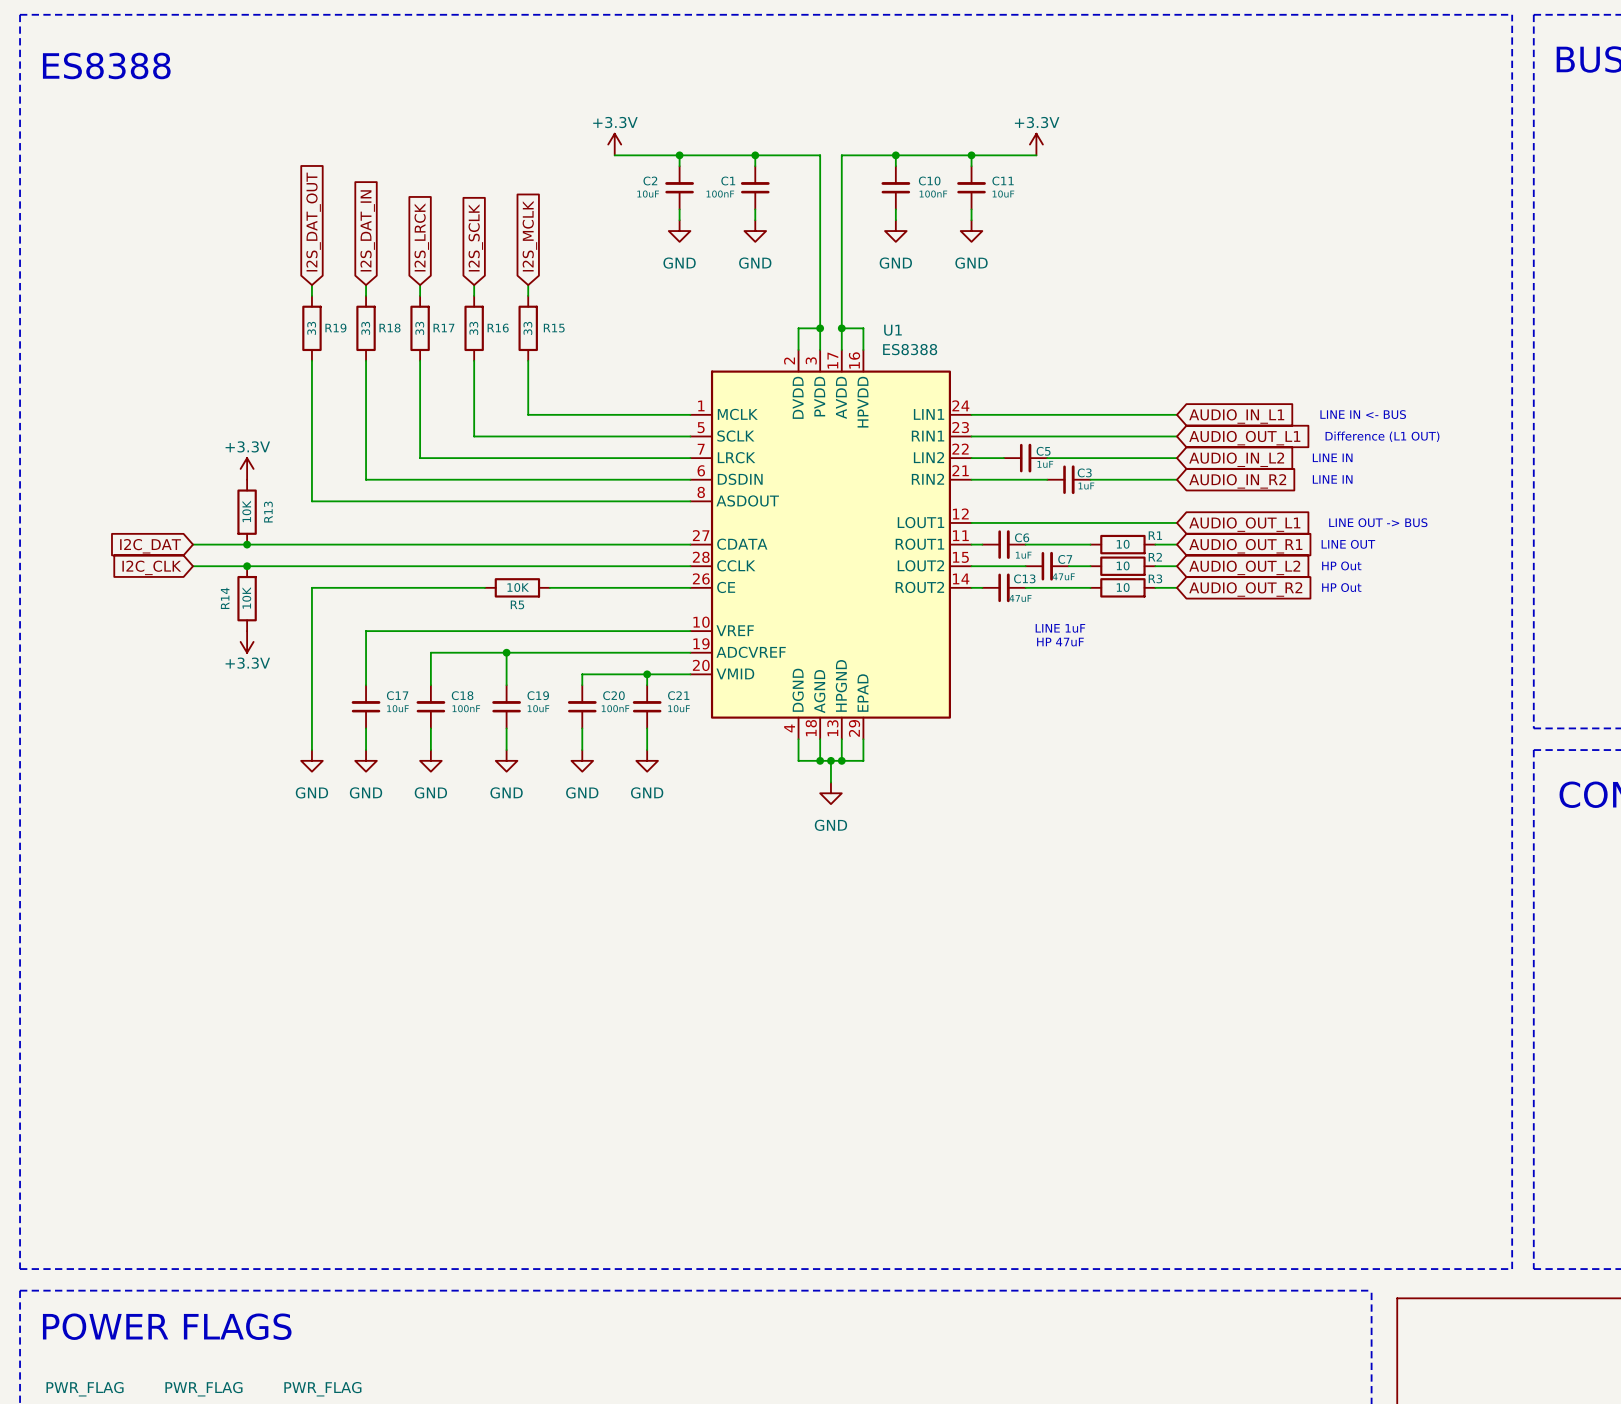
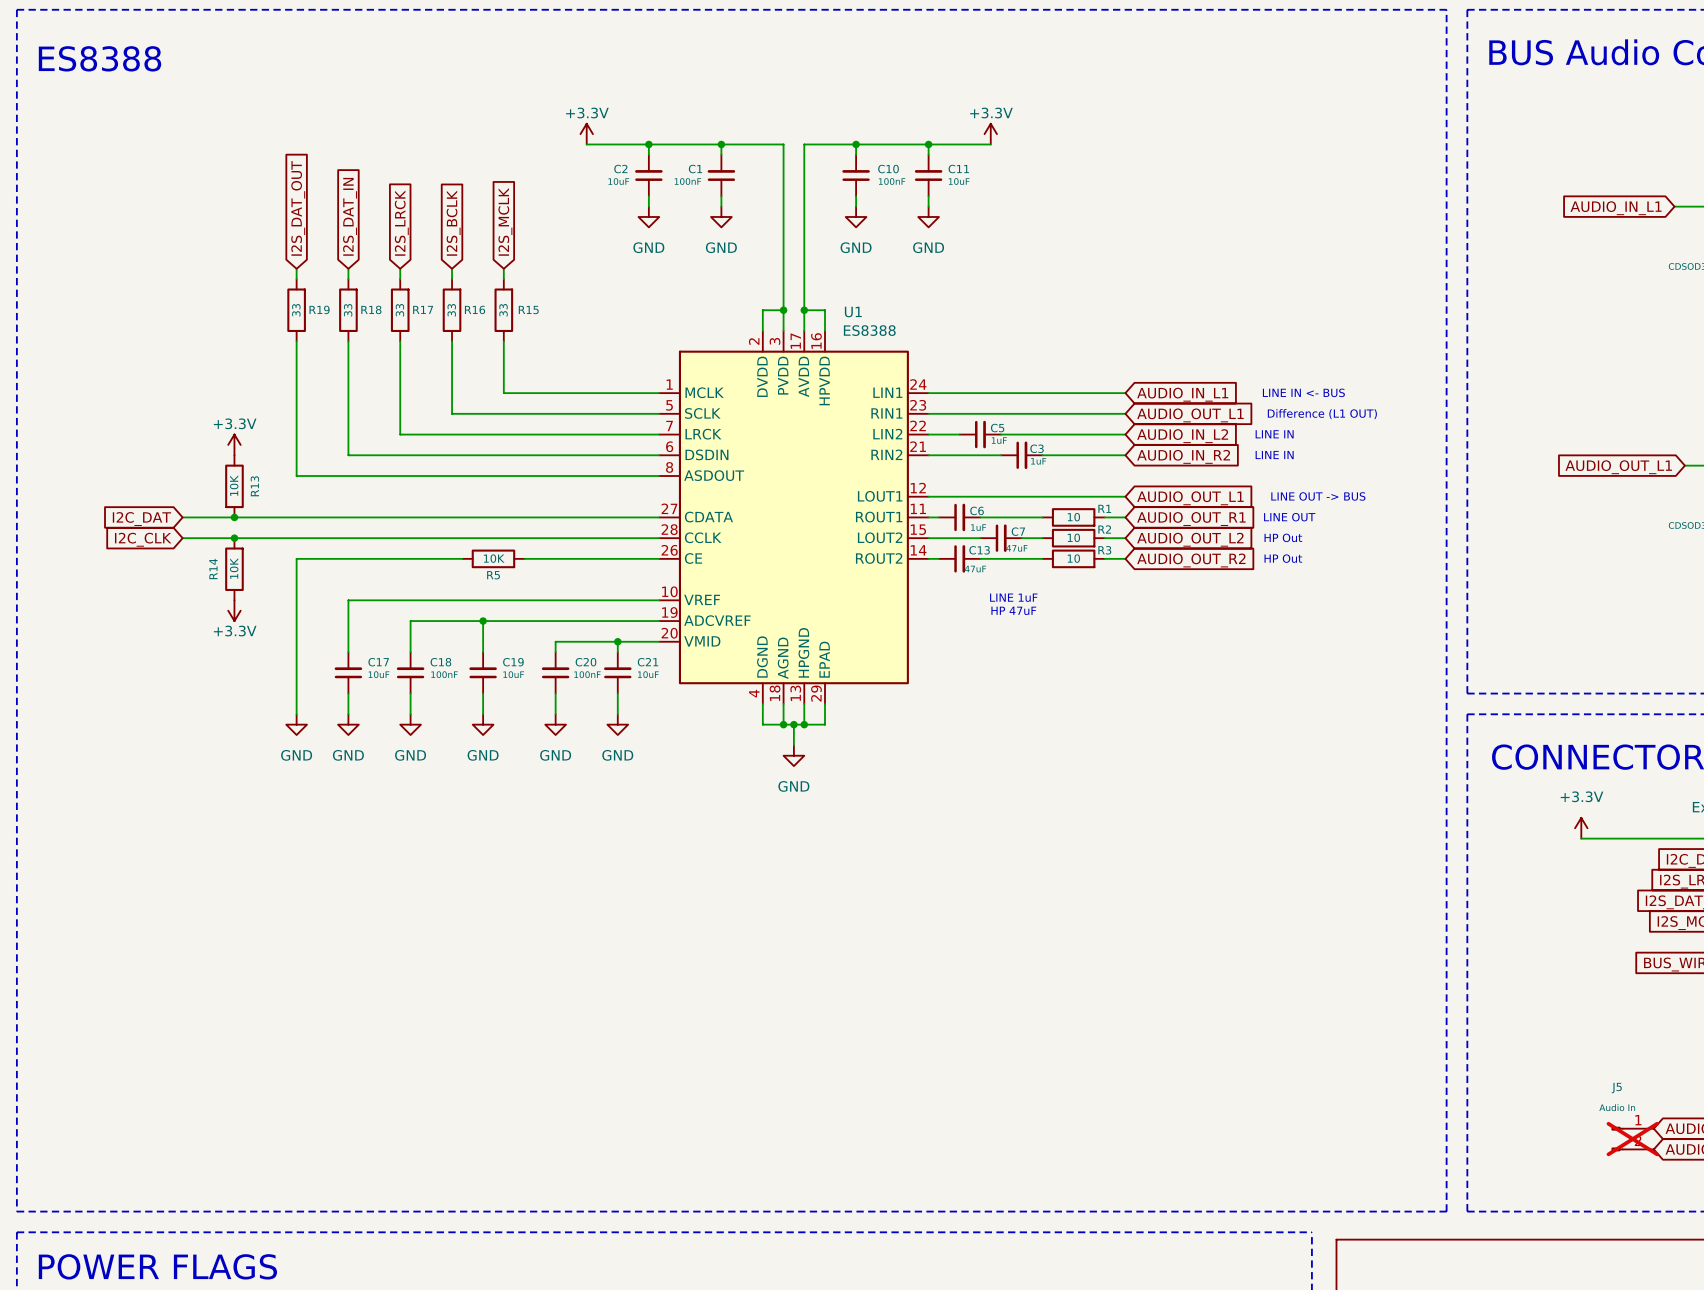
global label: I2S_SCLK (475, 237) -> I2S_BCLK (453, 223)

